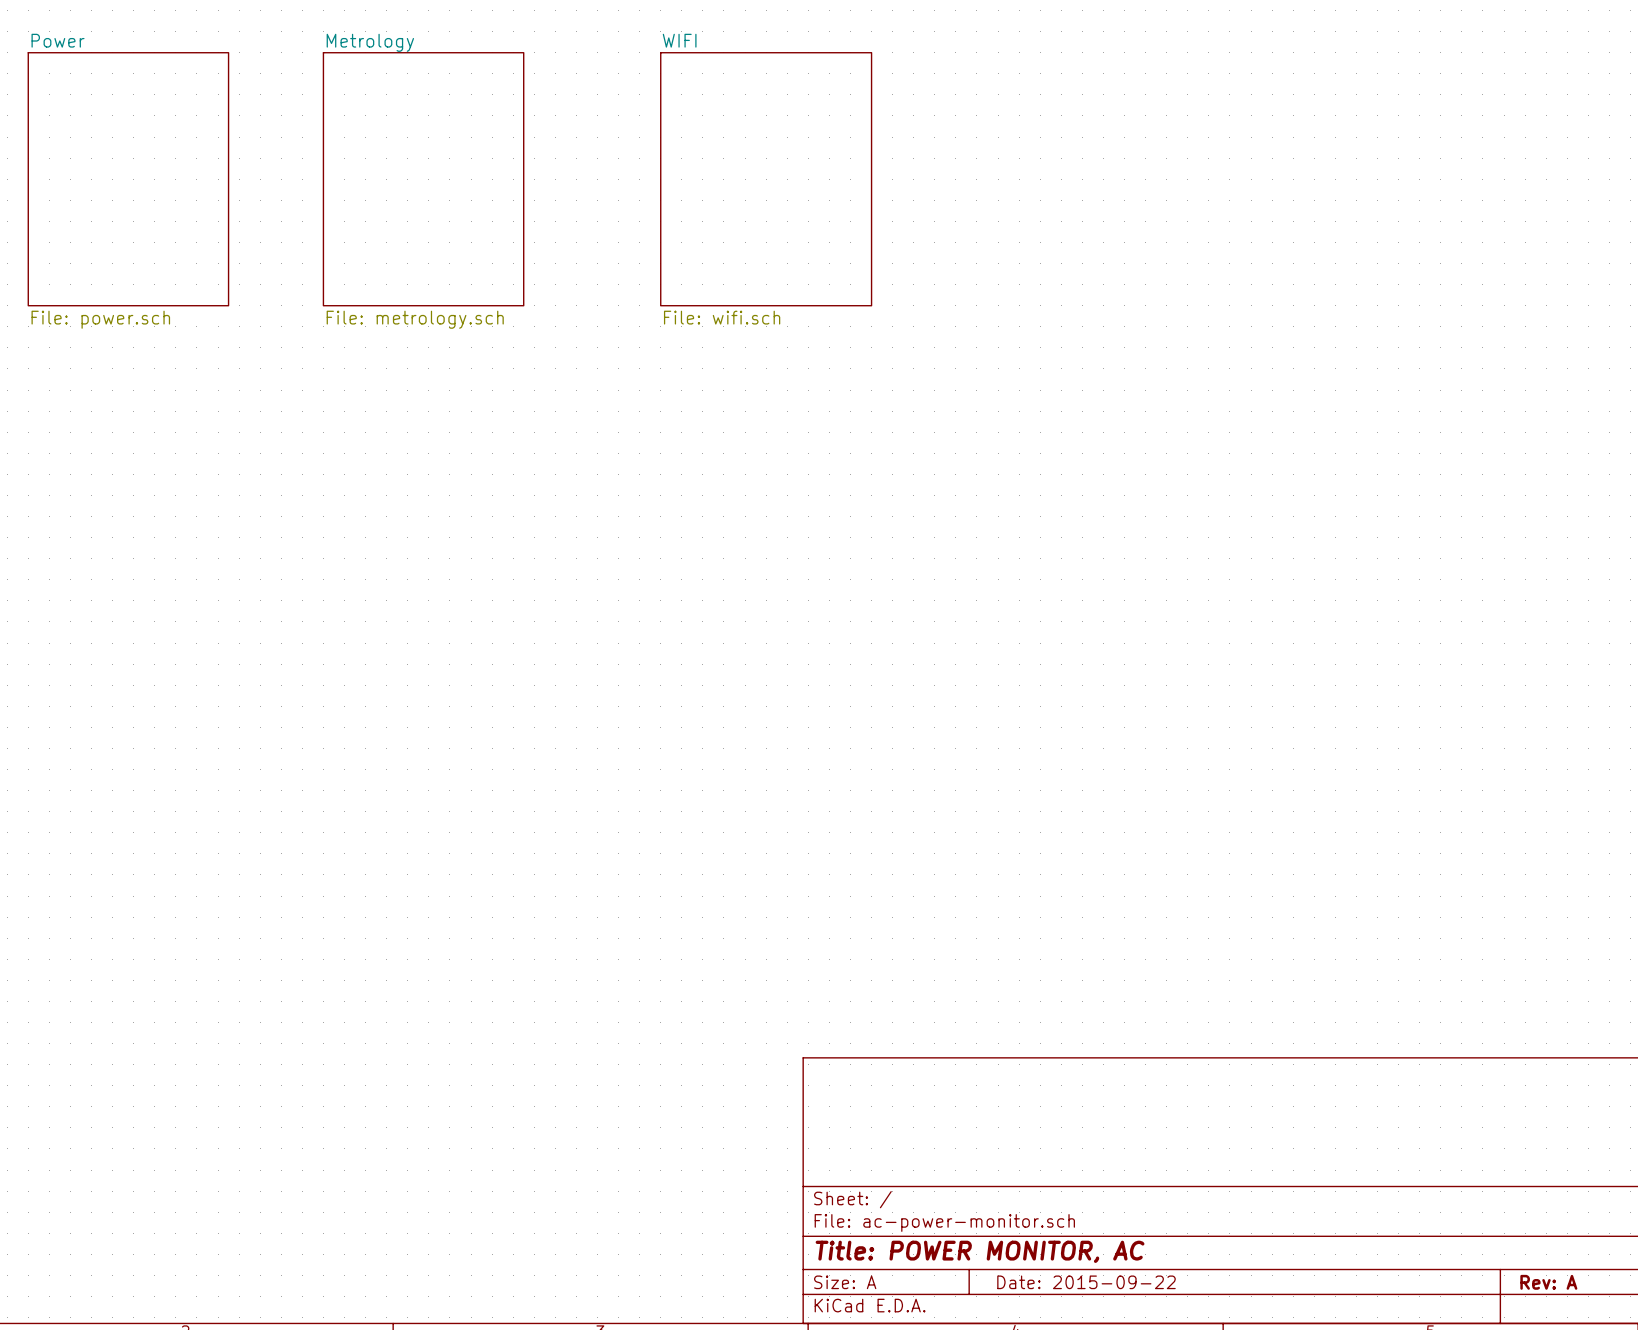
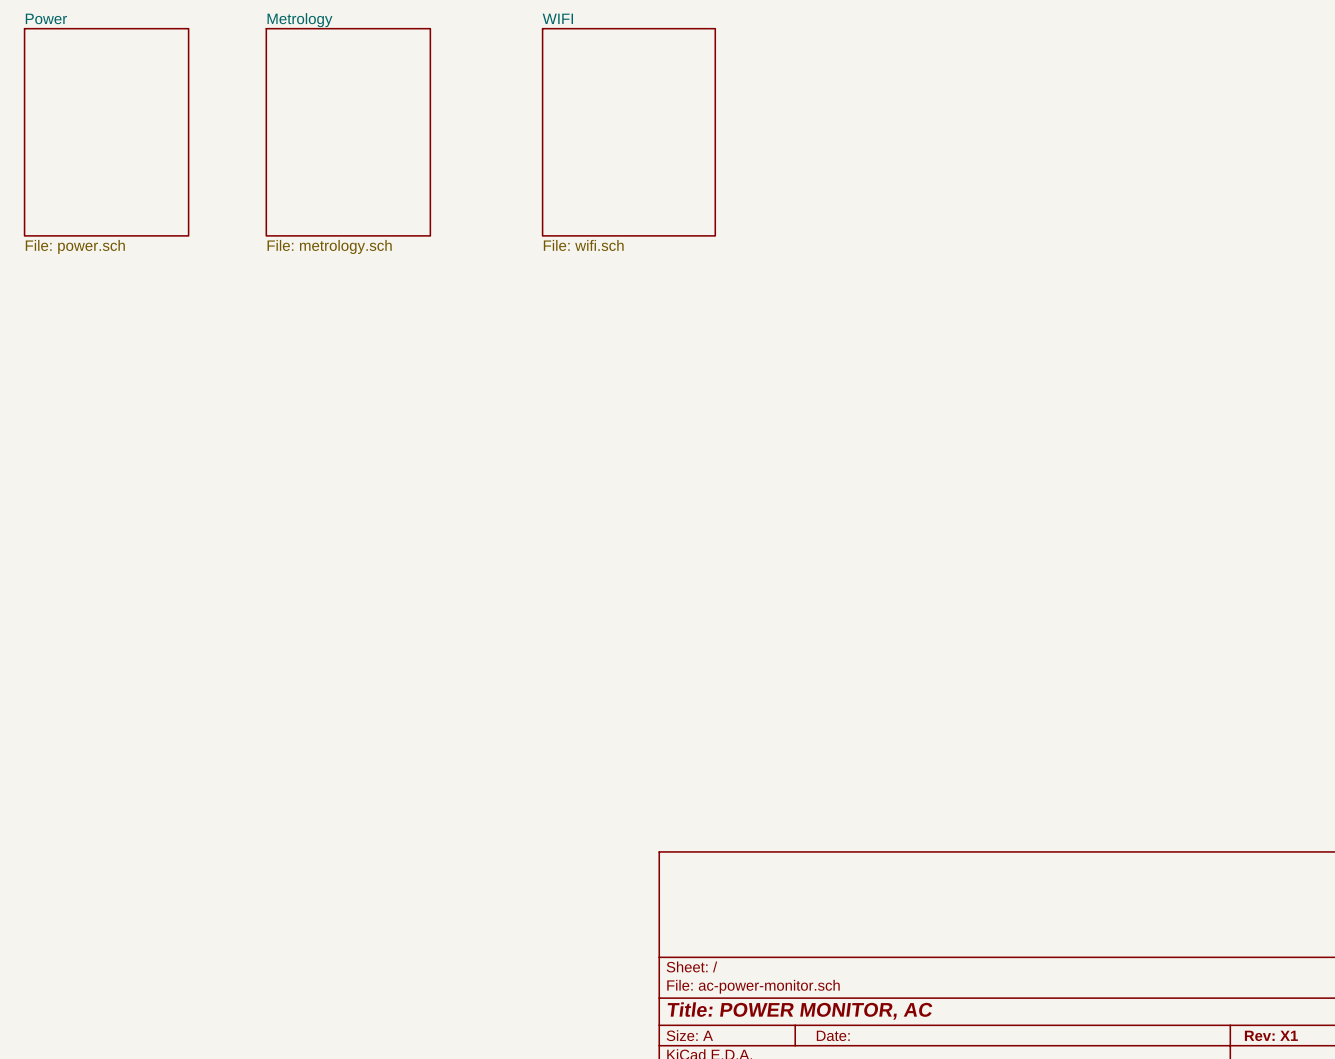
title block: Date: 2015-09-22 (1086, 1282) -> Date: (833, 1035)
title block: Rev: A (1548, 1282) -> Rev: X1 (1271, 1035)

